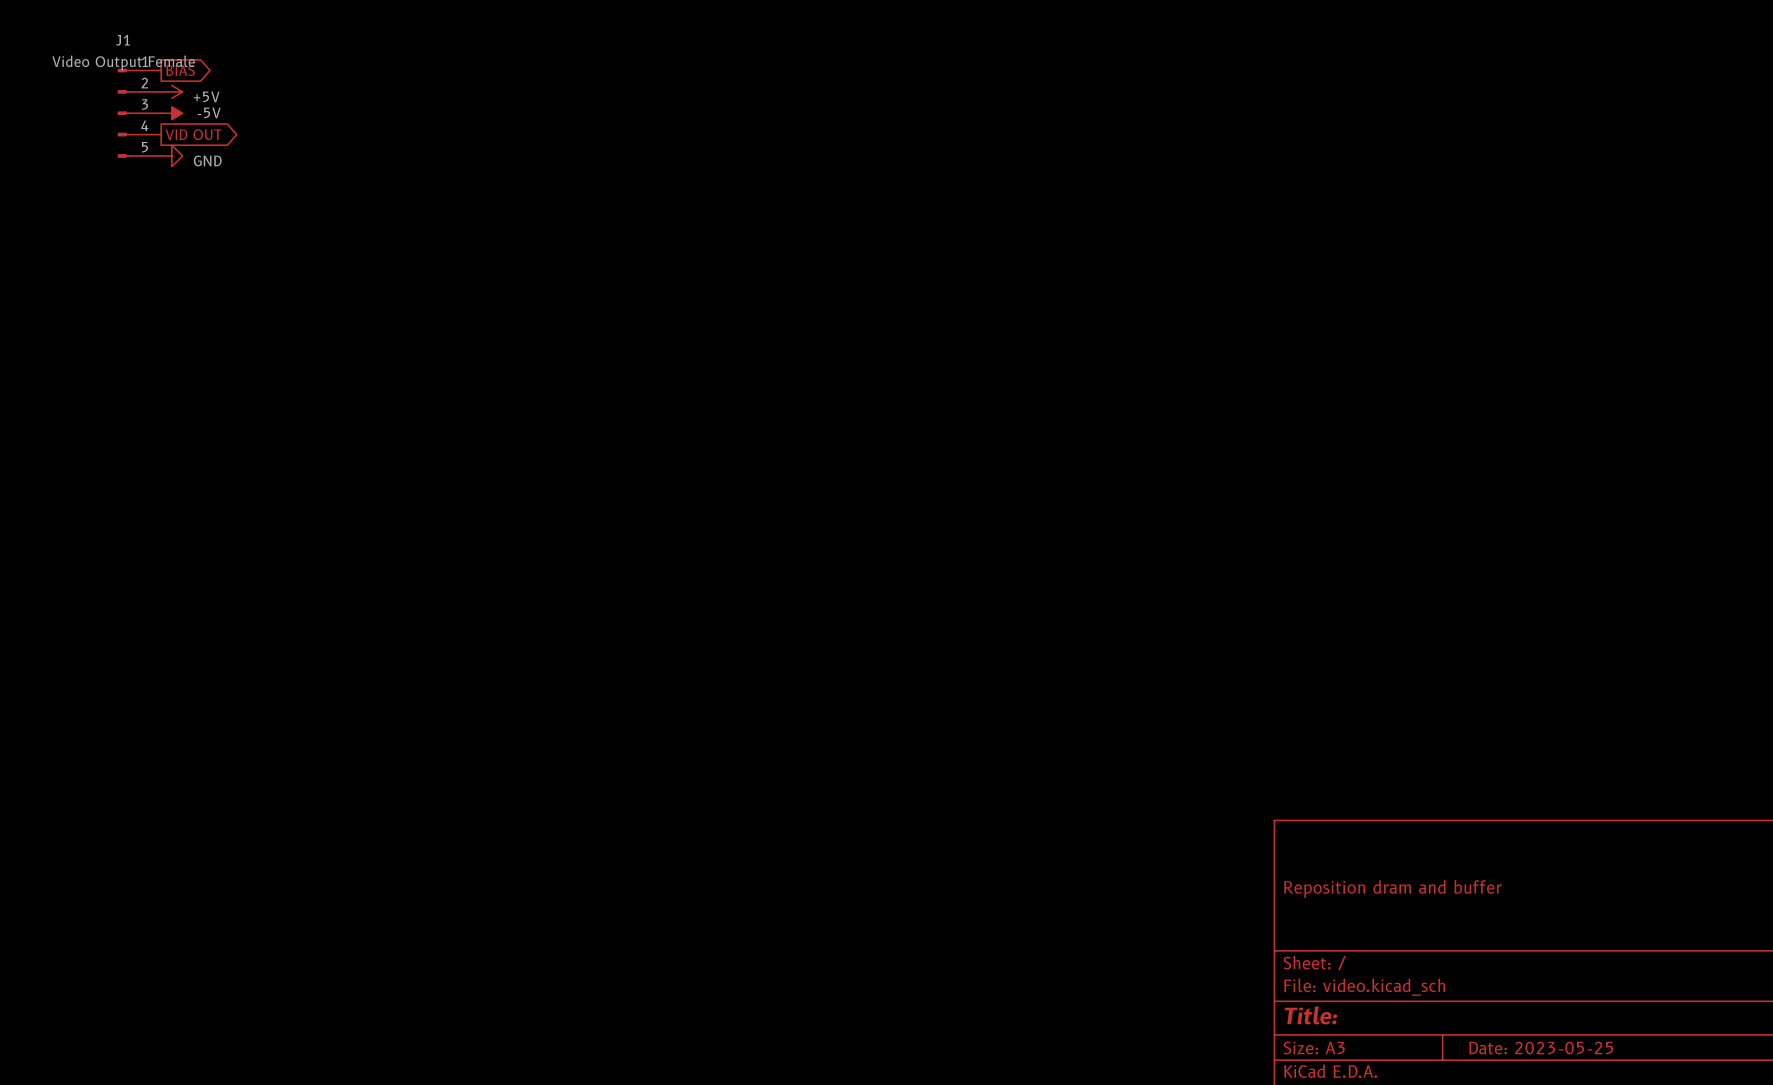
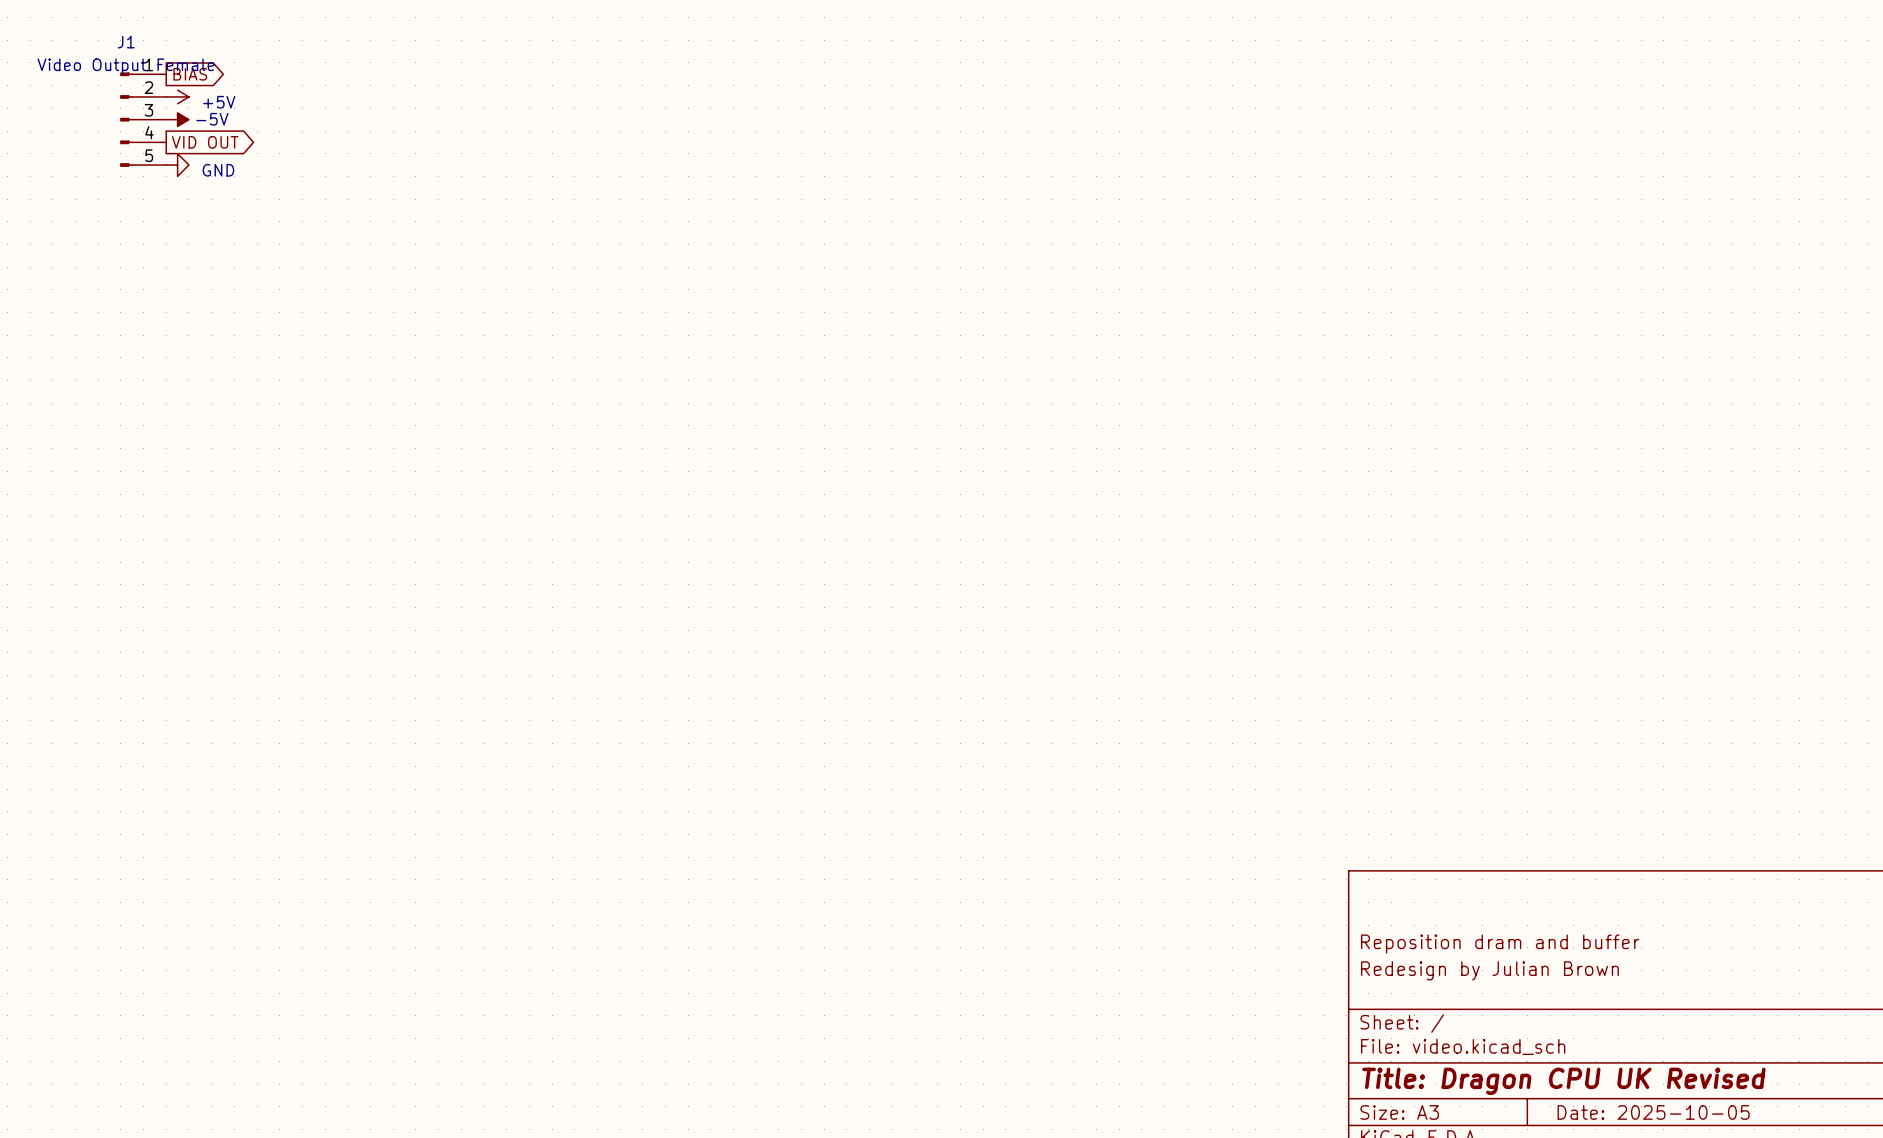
title block: none -> Redesign by Julian Brown (1489, 970)
title block: Title: (1310, 1015) -> Title: Dragon CPU UK Revised (1563, 1081)
title block: Date: 2023-05-25 (1541, 1048) -> Date: 2025-10-05 (1653, 1112)

